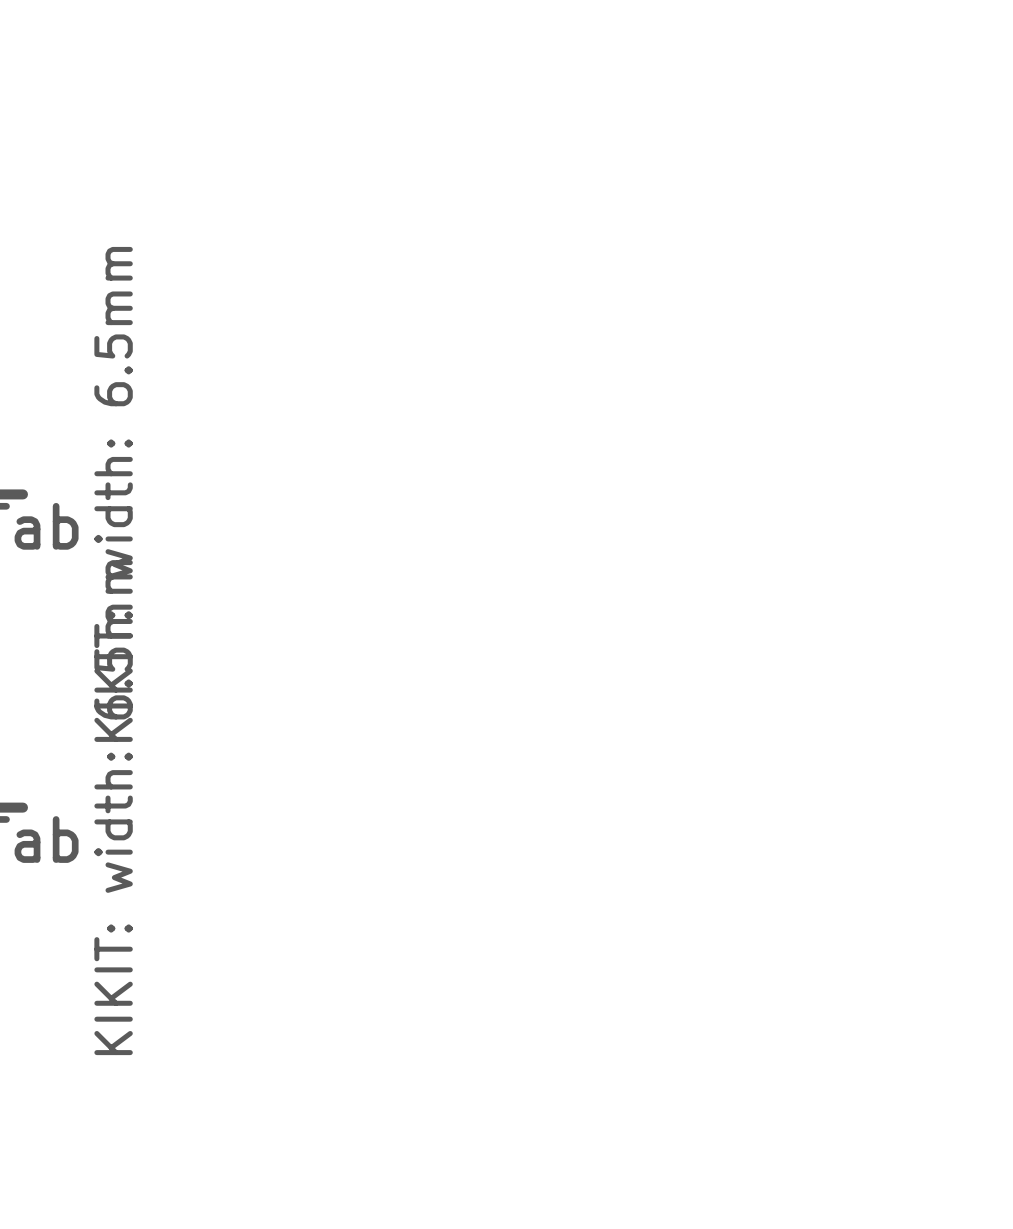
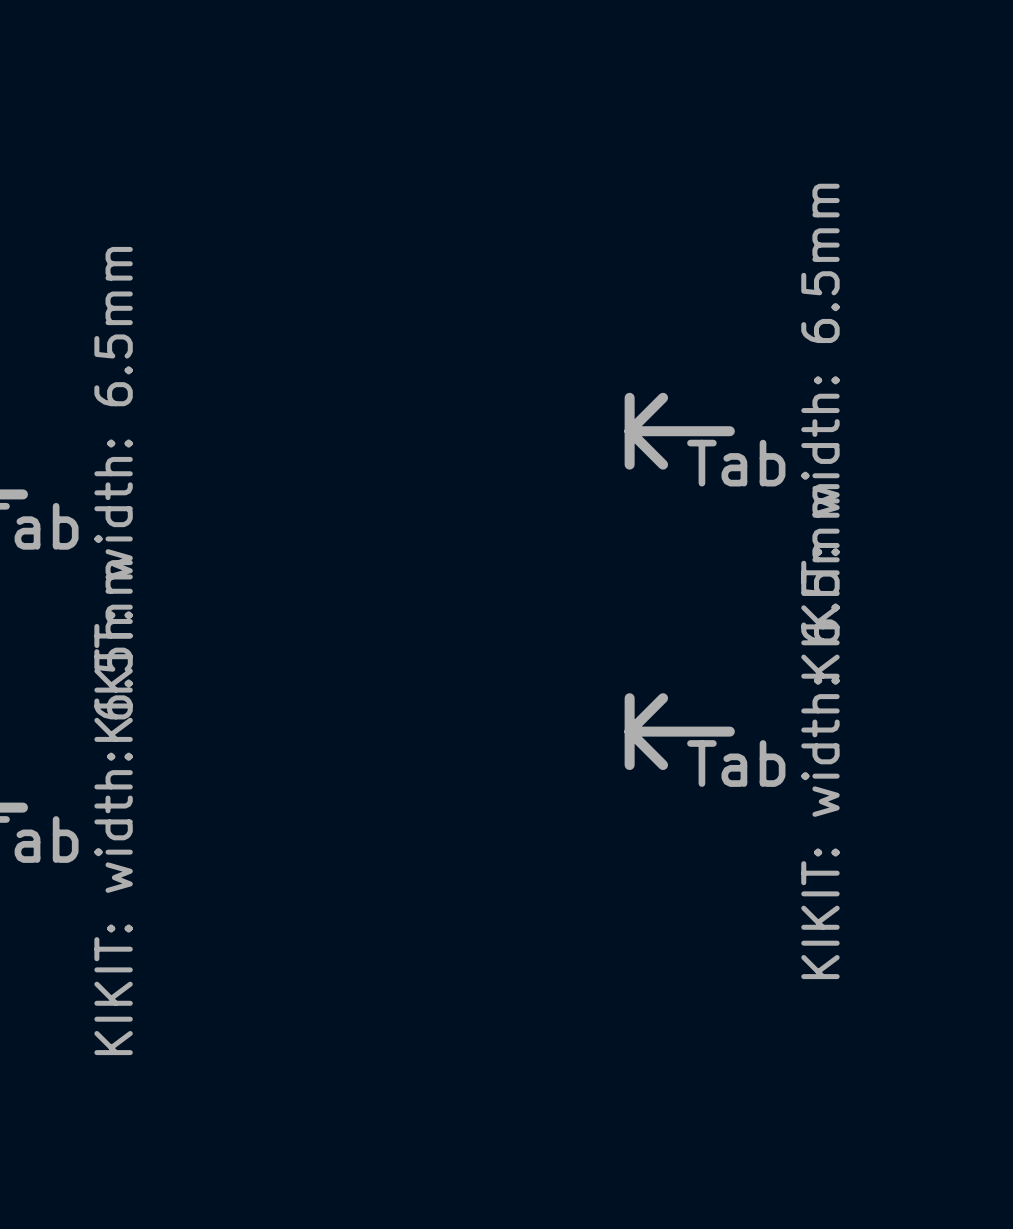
drawing: none -> [624, 392, 735, 771]

